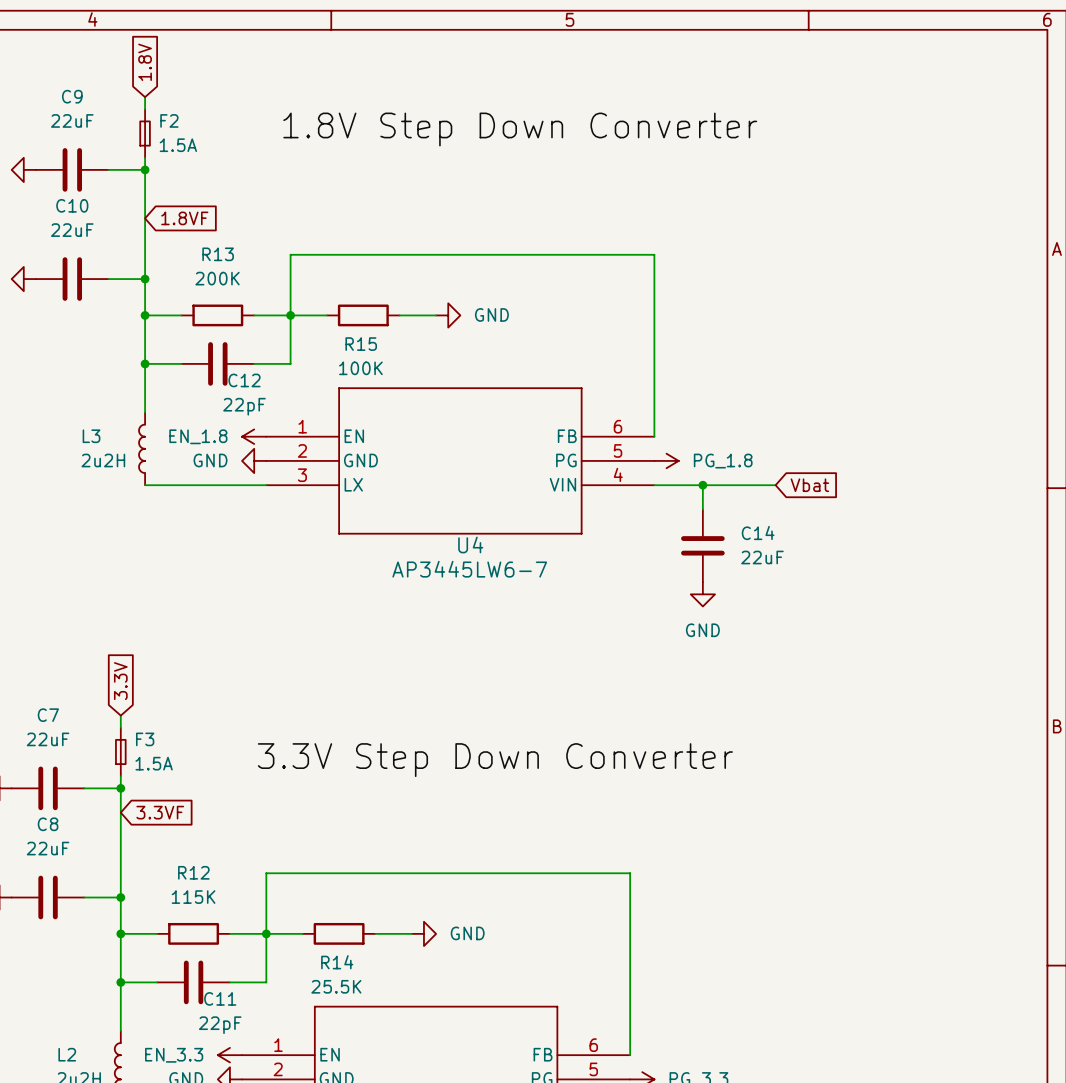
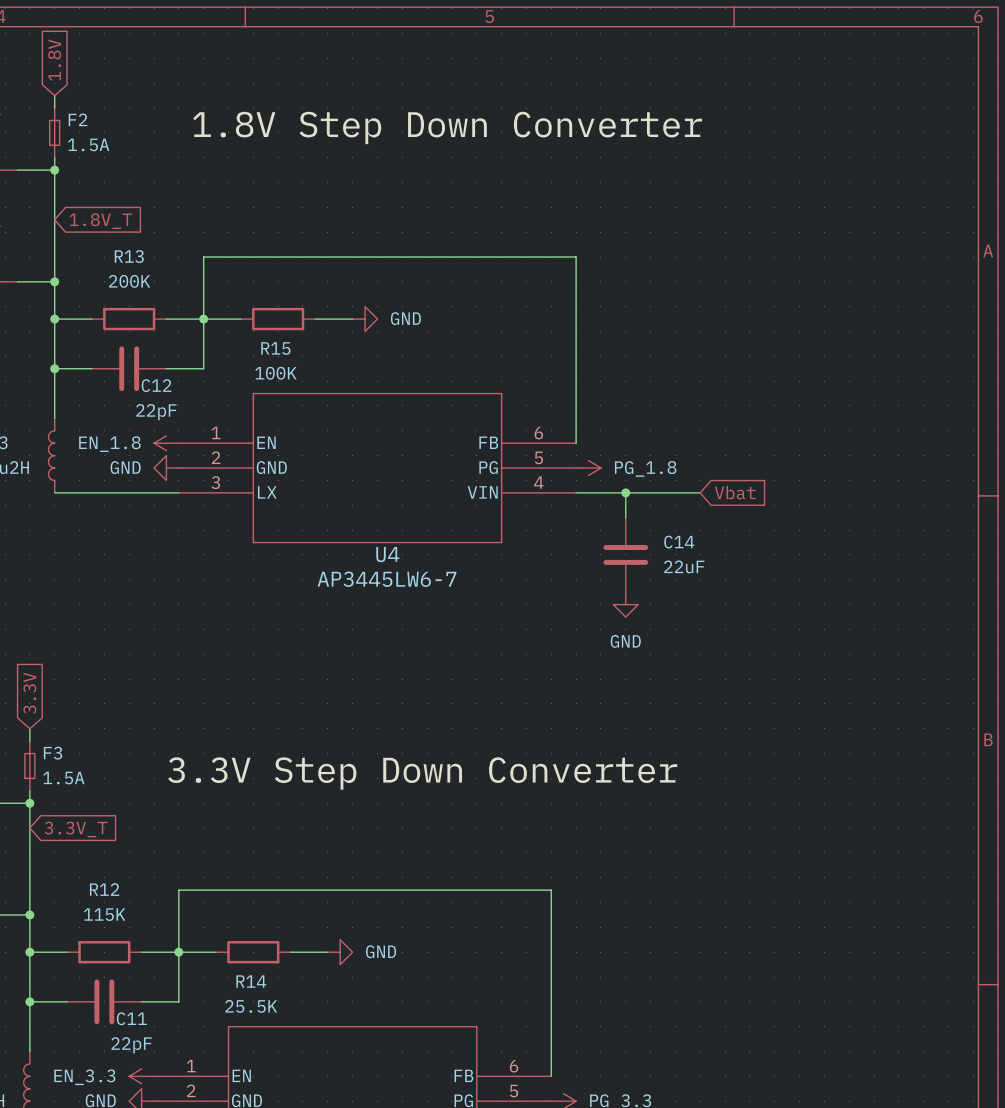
global label: 1.8VF (184, 218) -> 1.8V_T (100, 221)
global label: 3.3VF (160, 812) -> 3.3V_T (76, 829)

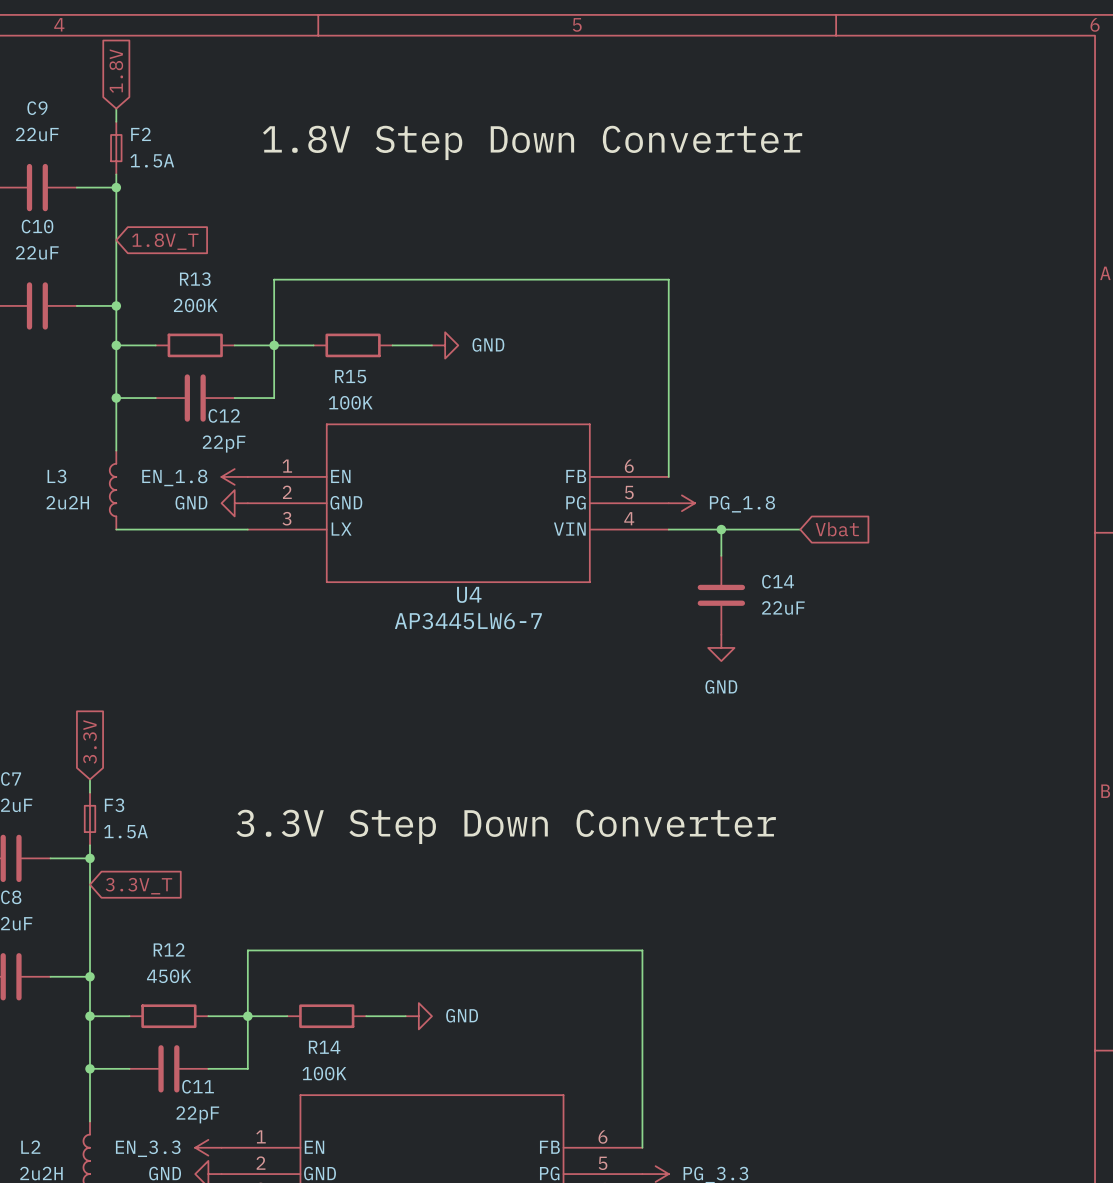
R12 value: 115K (104, 914) -> 450K (169, 976)
R14 value: 25.5K (251, 1006) -> 100K (324, 1073)

